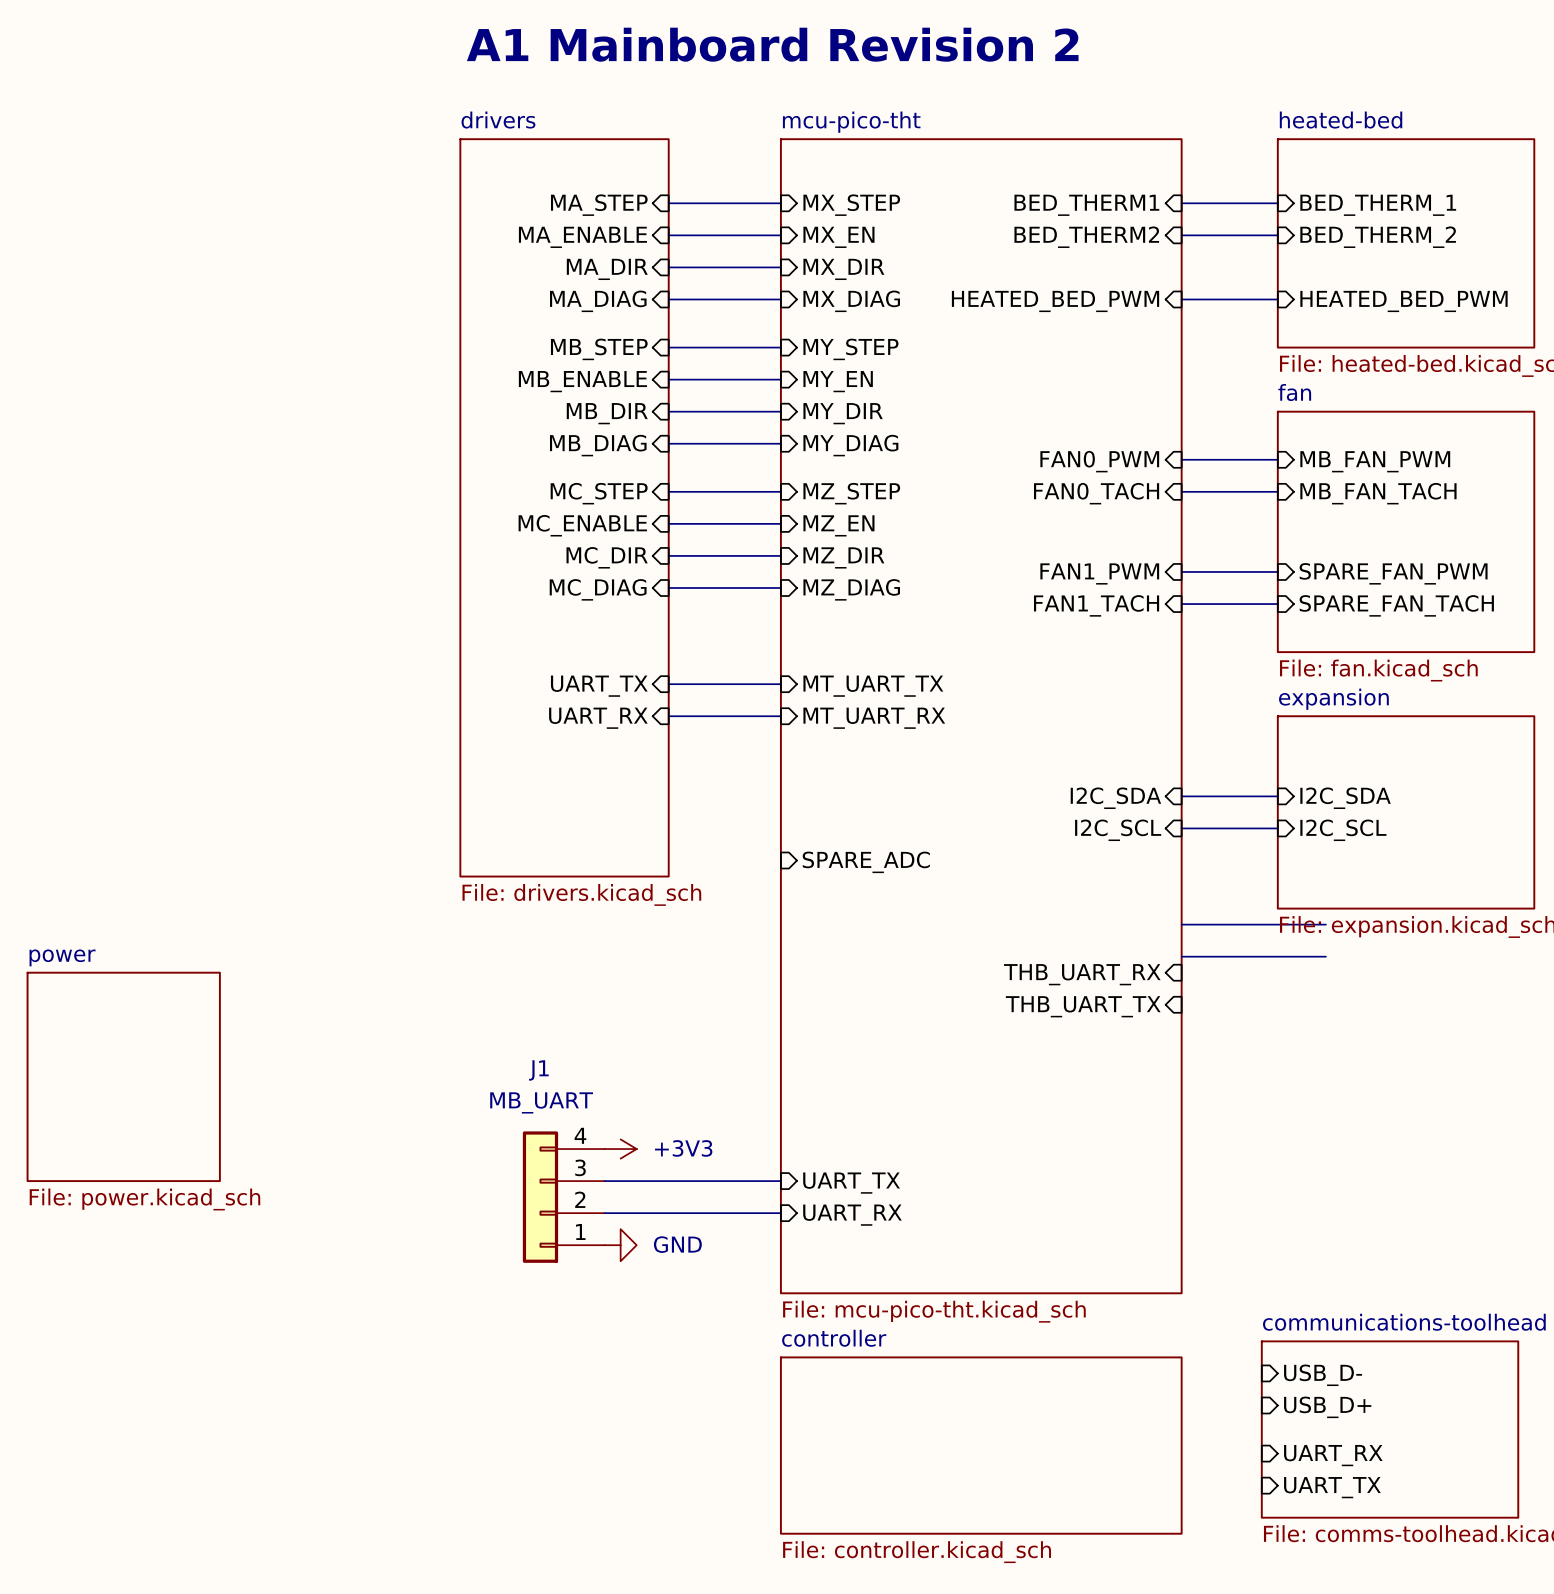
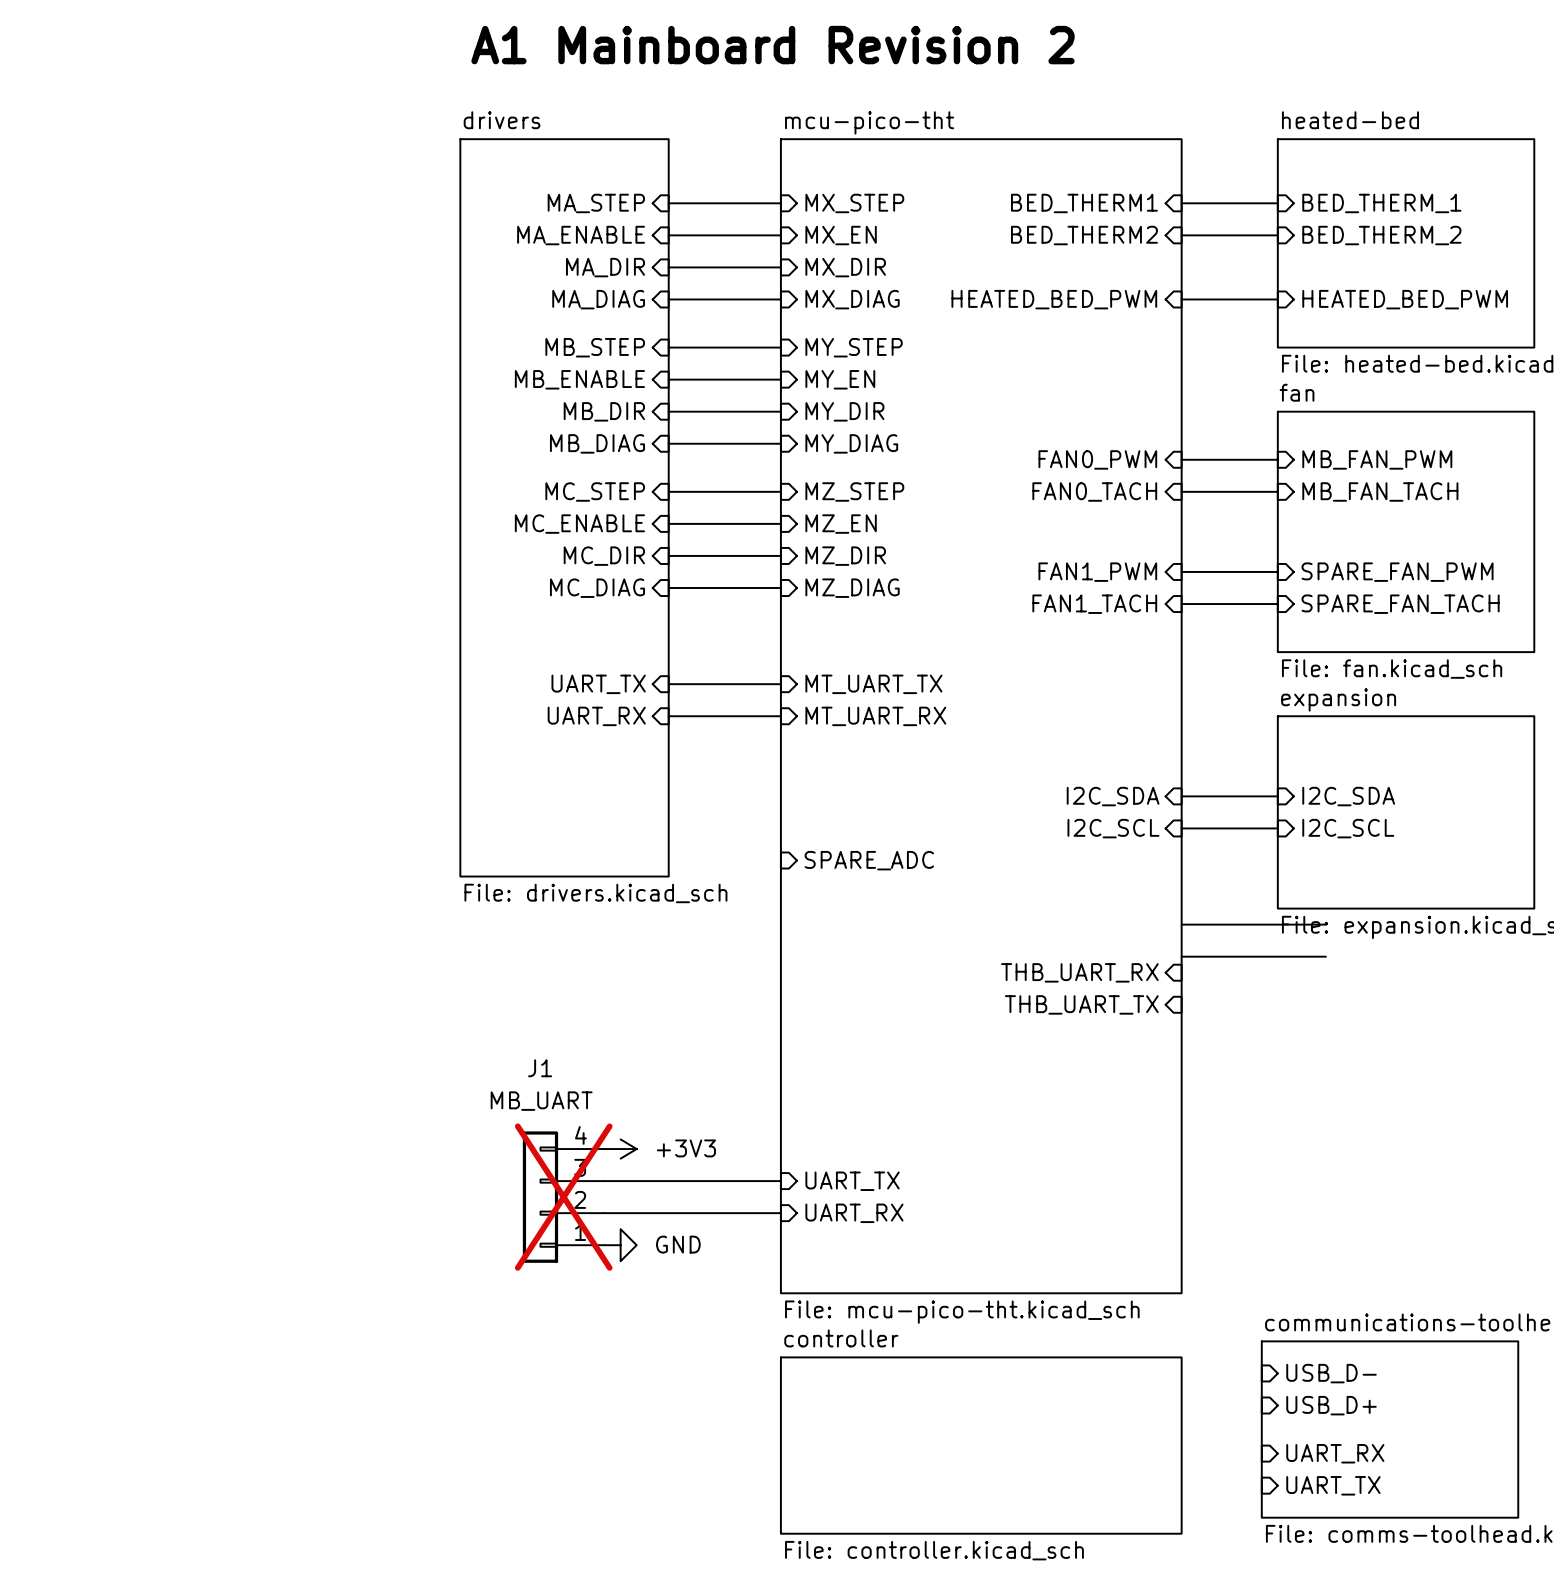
sheet power: File: power.kicad_sch (123, 1076) -> none
J1 do-not-place cross: none -> (563, 1197)

